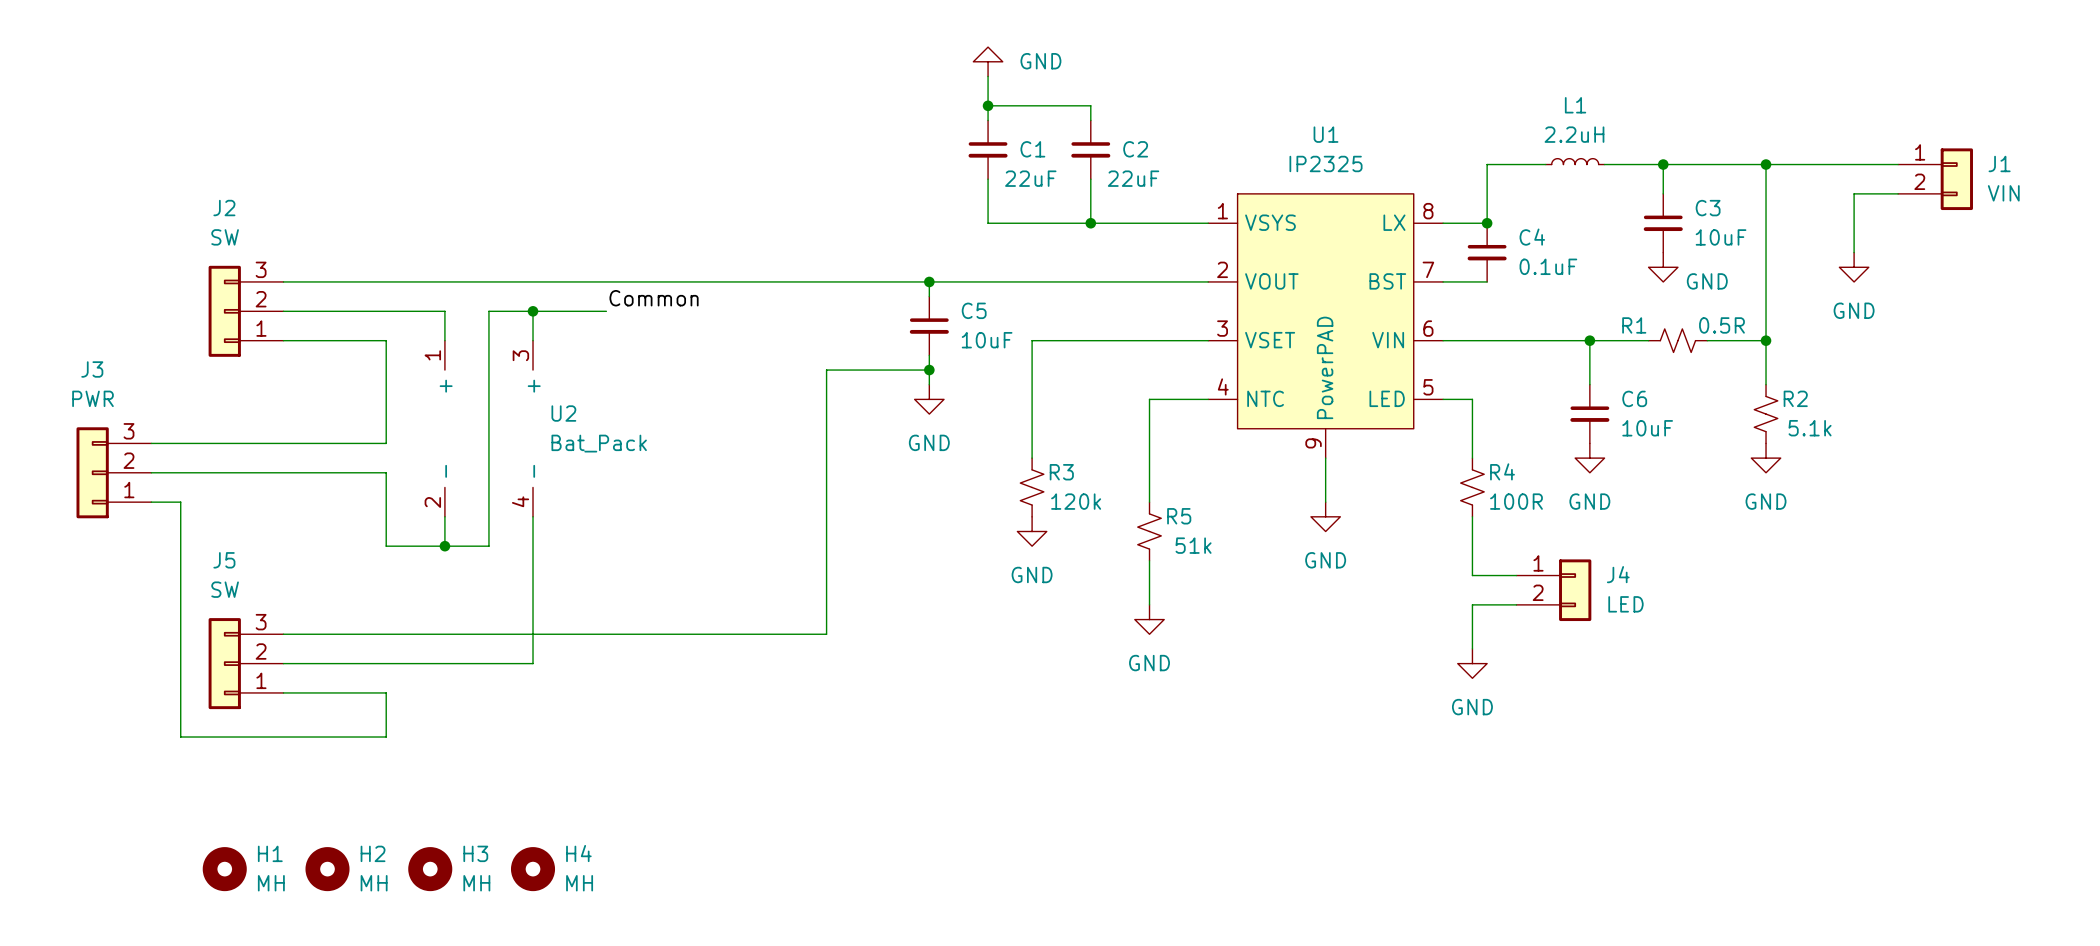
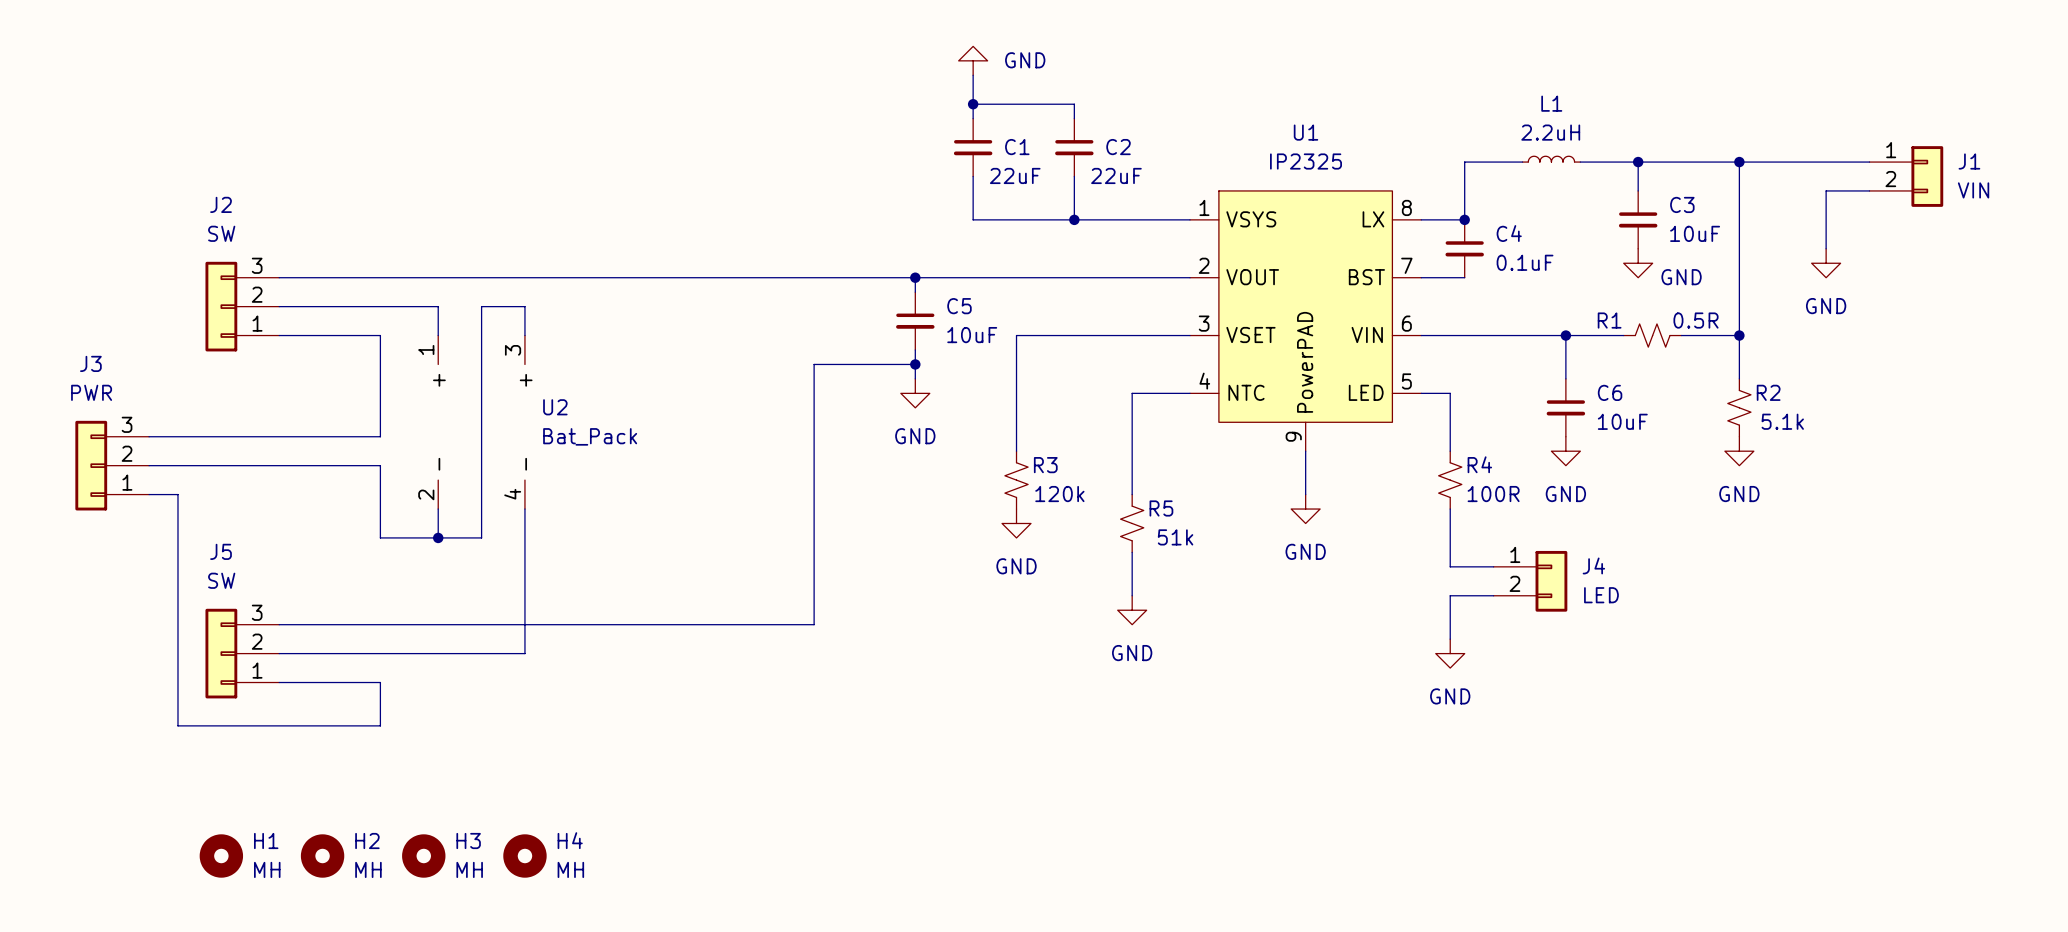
label: Common (654, 298) -> none
wire: (533, 311) (606, 311) -> none
junction: (533, 311) -> none

